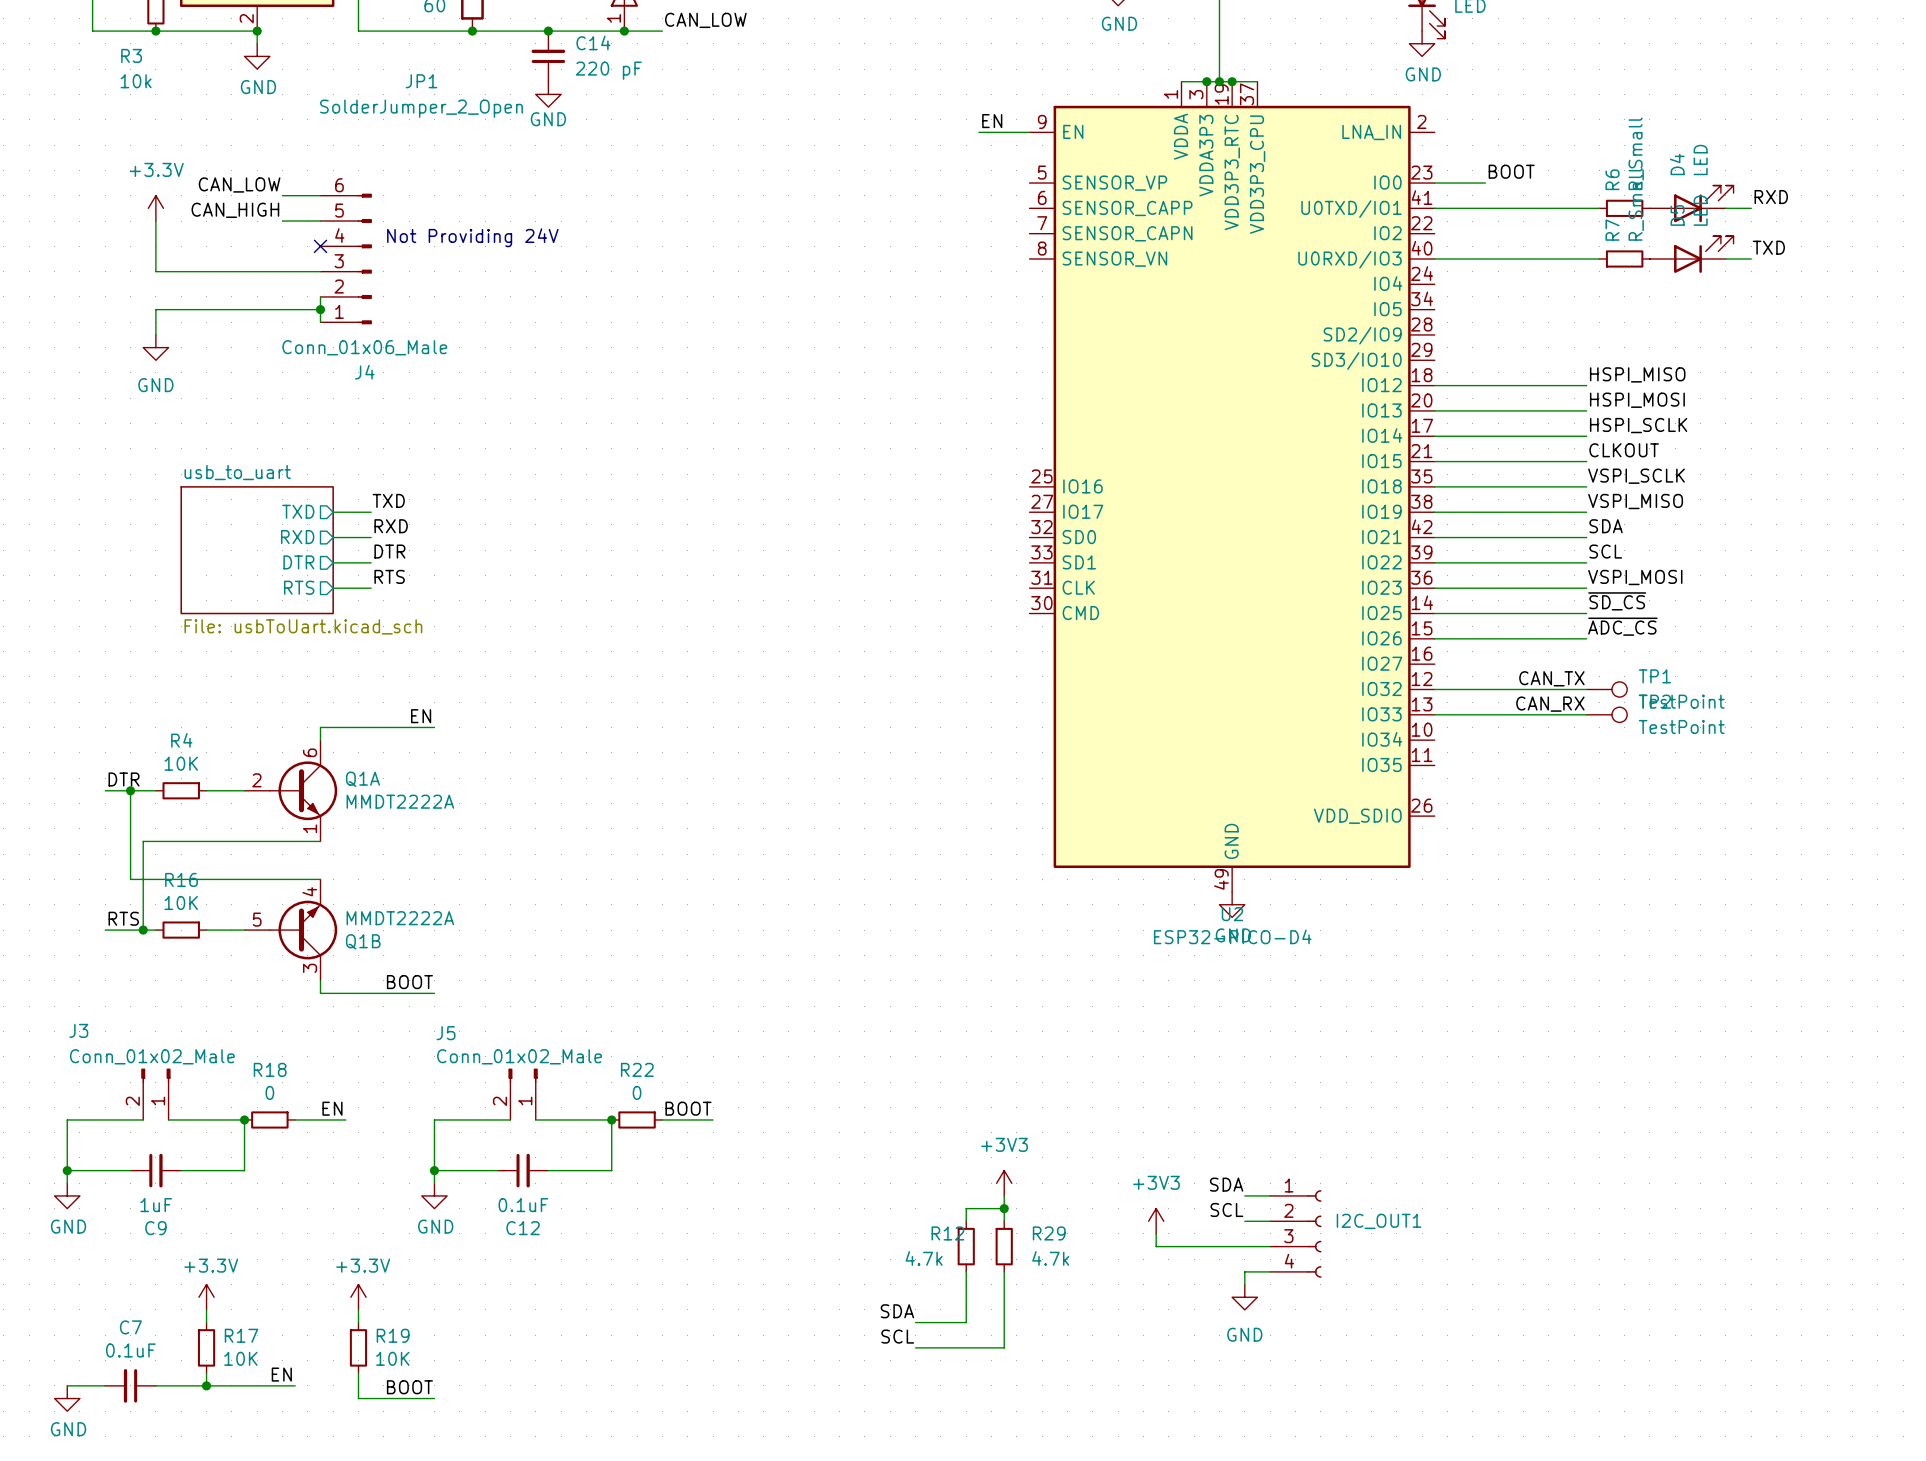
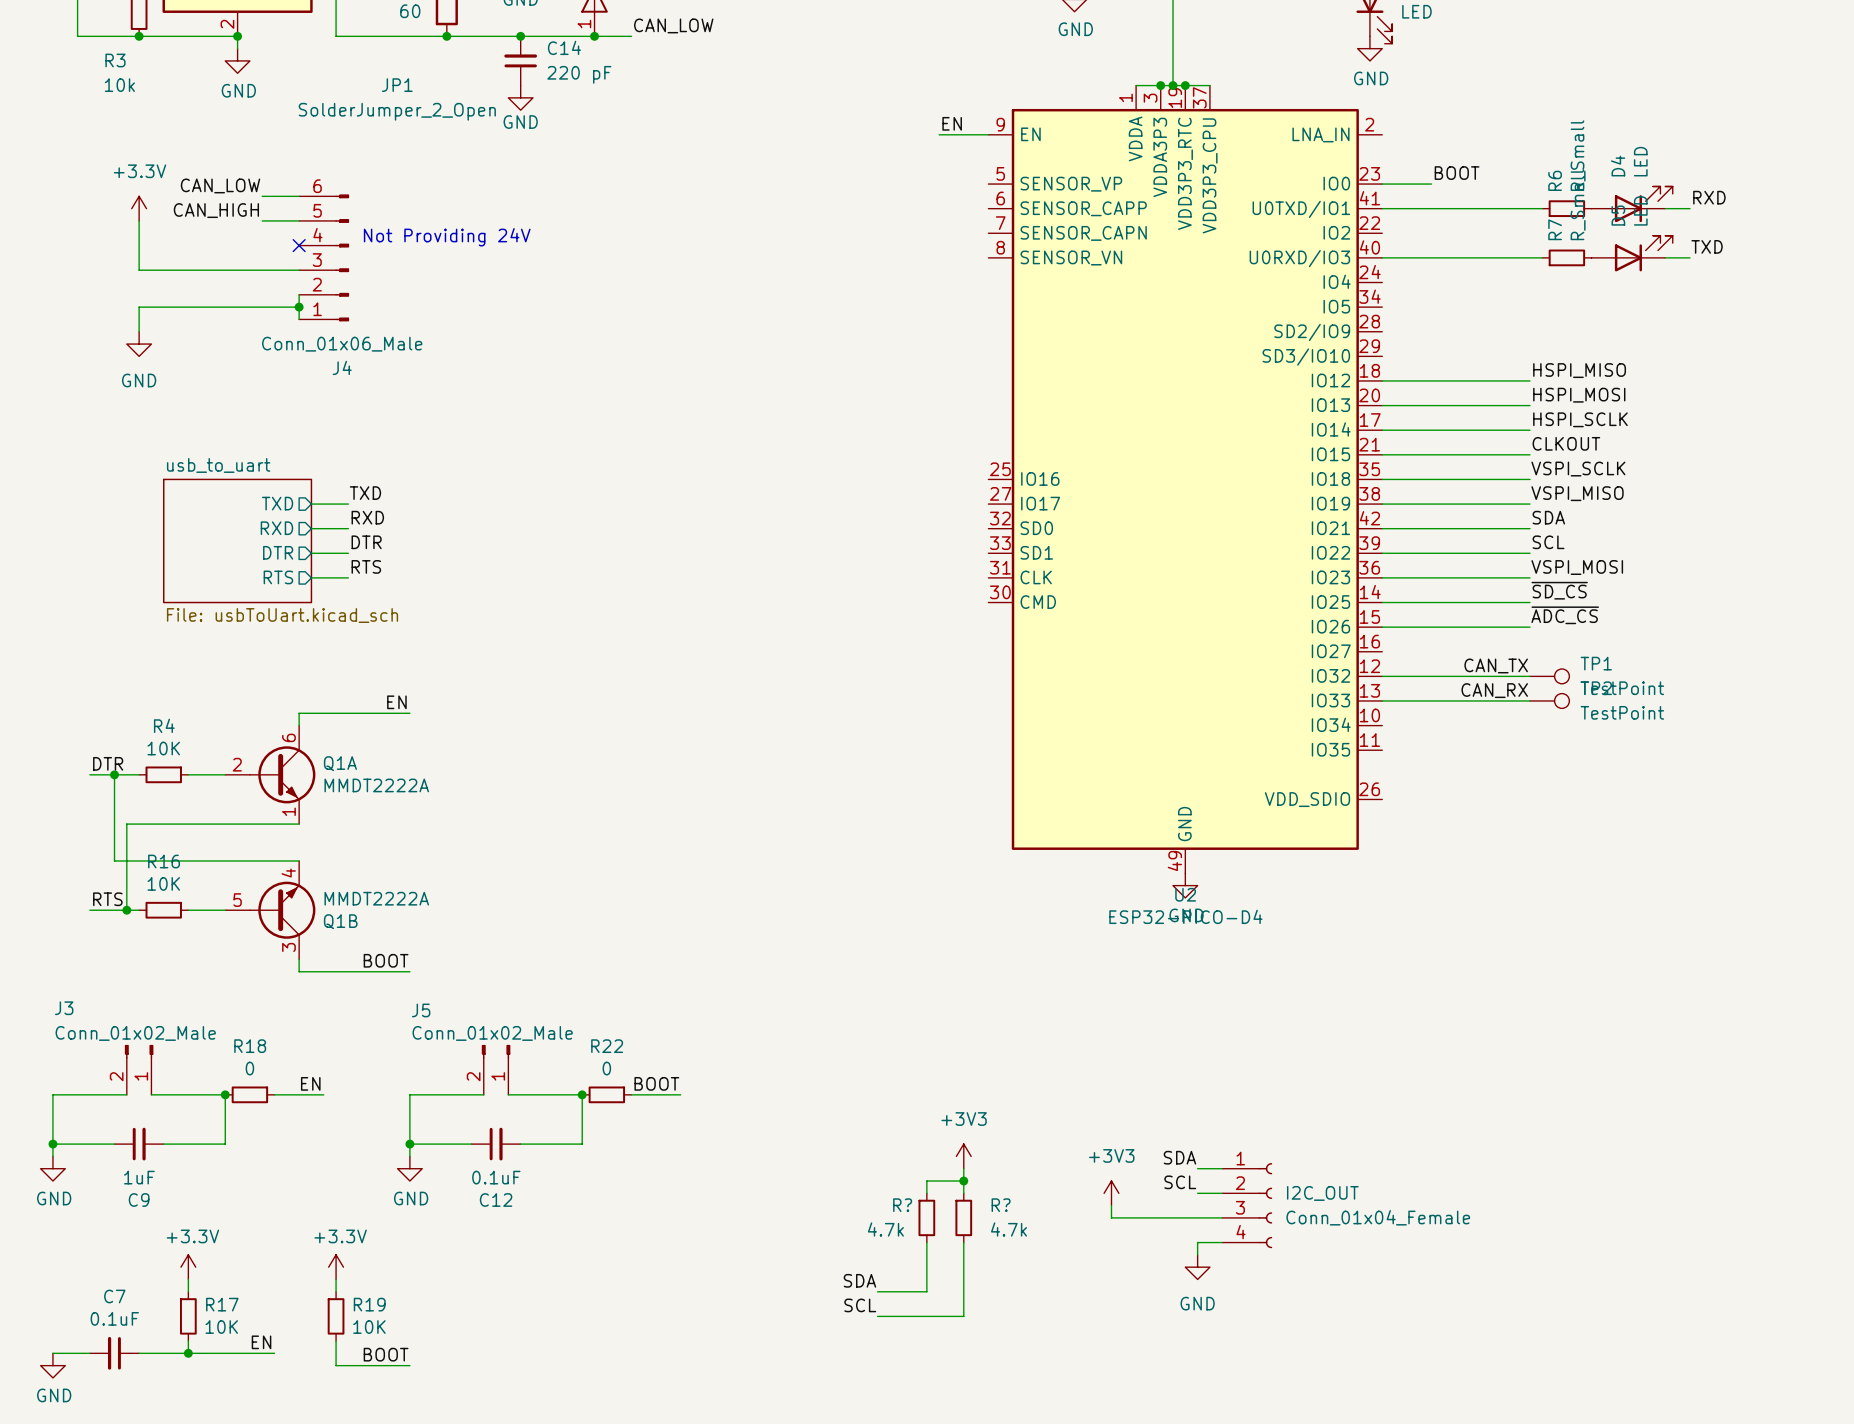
I2C_OUT1 name: I2C_OUT1 (1379, 1221) -> I2C_OUT (1322, 1193)
R12 name: R12 (947, 1233) -> R? (902, 1205)
R29 name: R29 (1049, 1233) -> R? (1001, 1205)
I2C_OUT1 value: none -> Conn_01x04_Female (1378, 1217)

